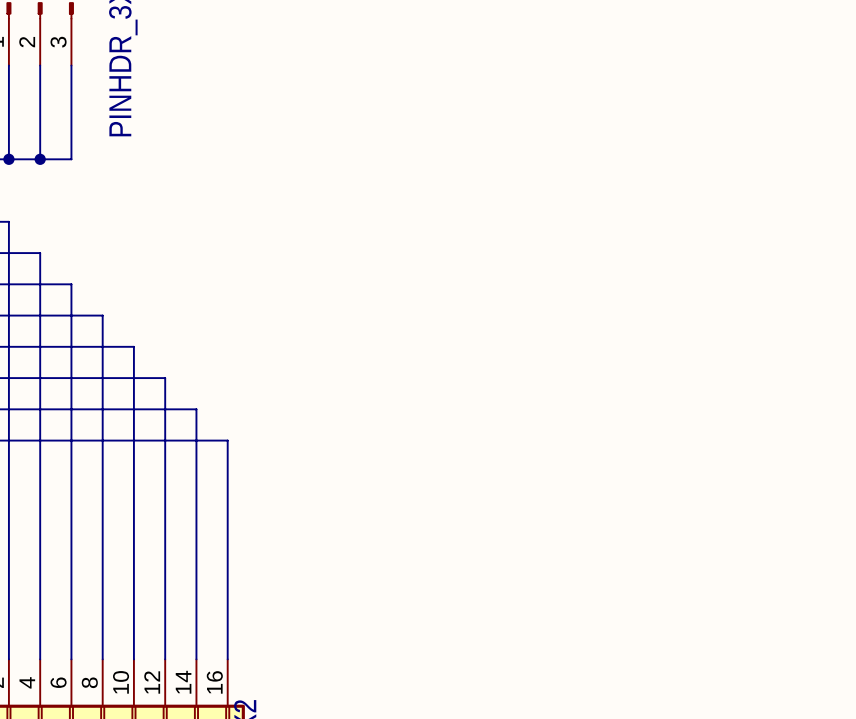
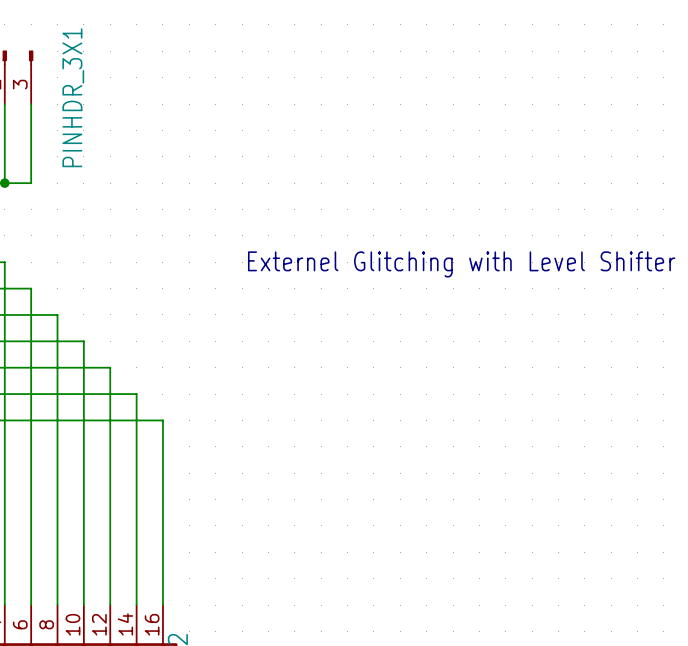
text: none -> Externel Glitching with Level Shifter (461, 264)

